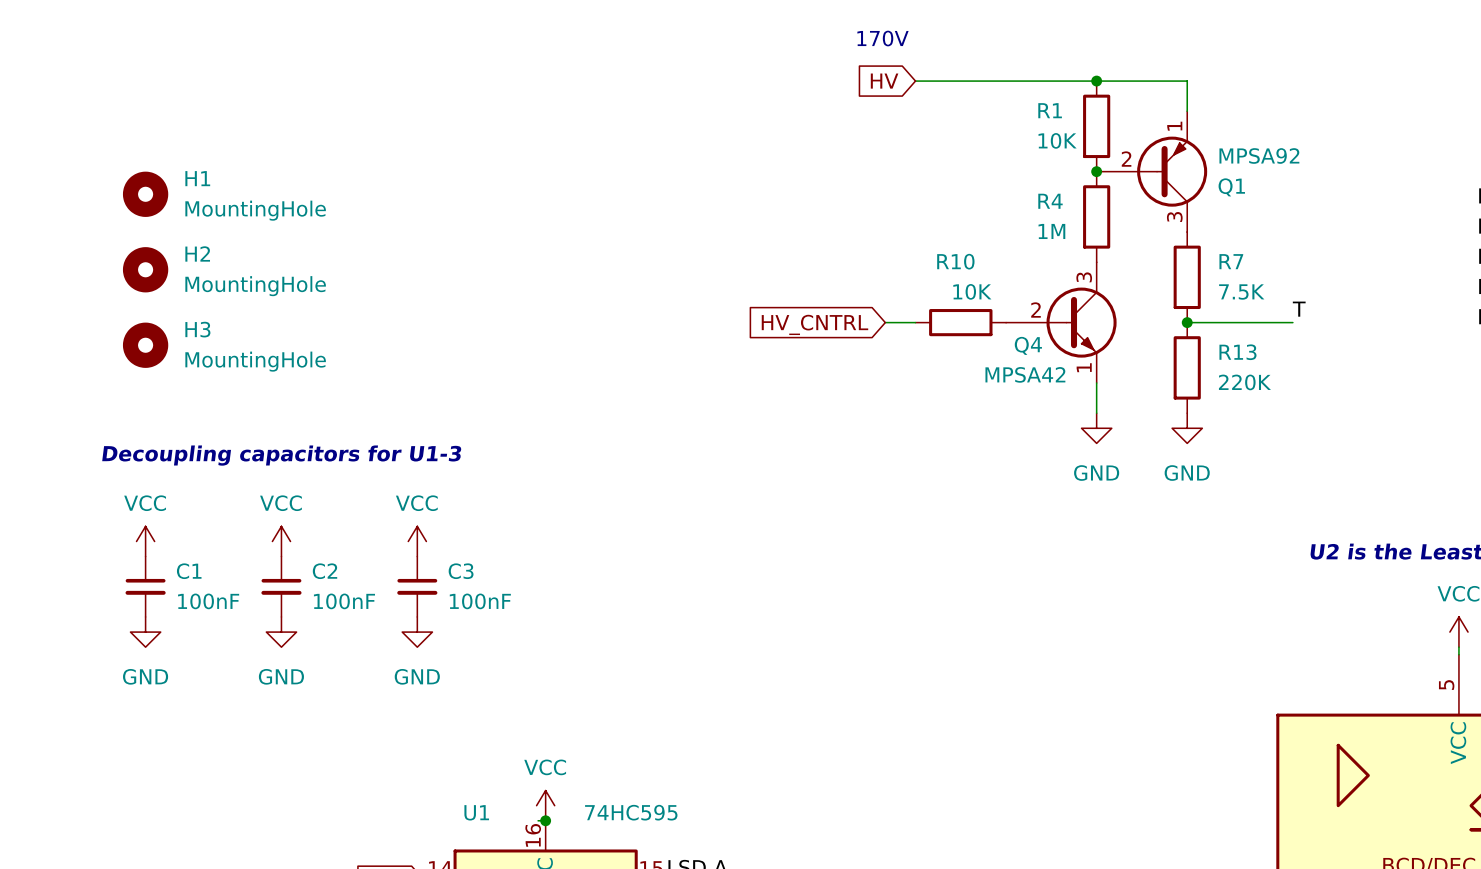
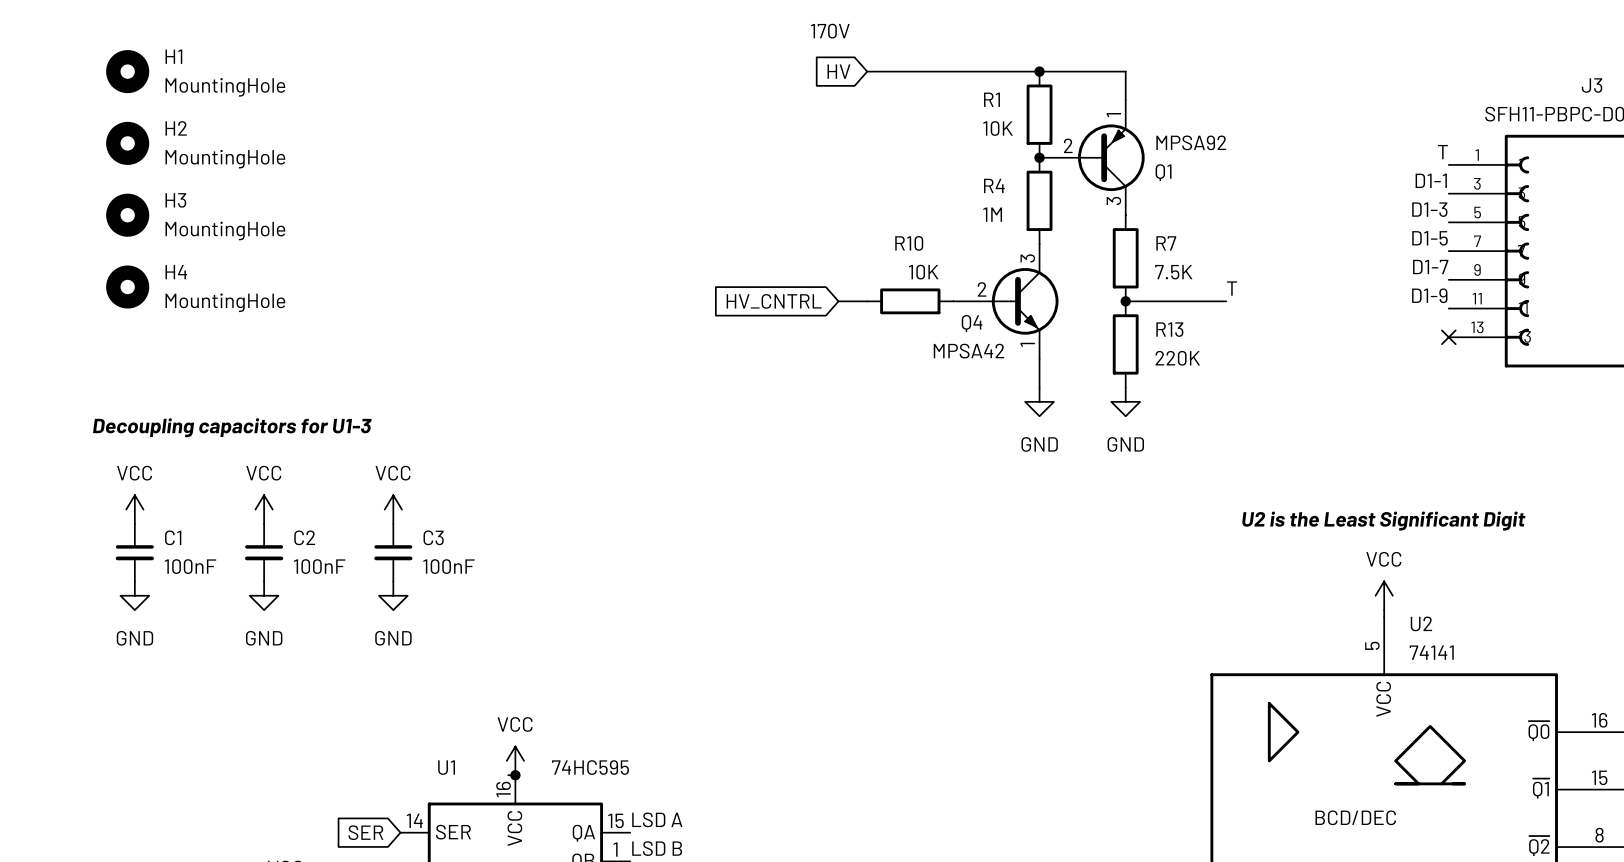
H1 position: (145, 194) -> (127, 71)
H2 position: (145, 269) -> (127, 143)
H4: none -> MountingHole (127, 287)
H3 position: (145, 345) -> (127, 215)

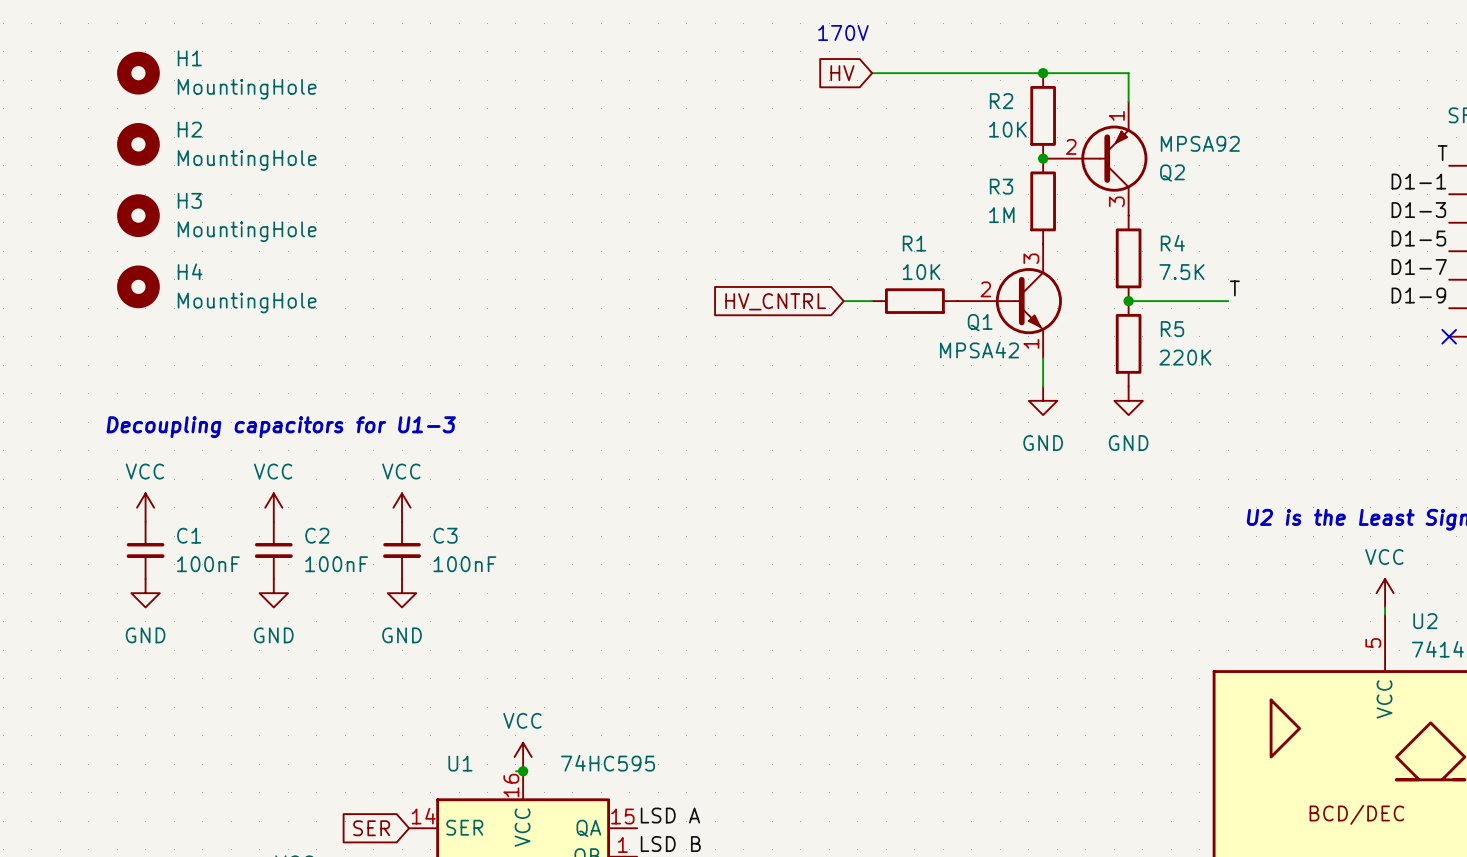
R1 name: R1 (991, 99) -> R2 (1001, 101)
Q1 name: Q1 (1163, 172) -> Q2 (1172, 173)
R4 name: R4 (994, 185) -> R3 (1001, 186)
R10 name: R10 (909, 243) -> R1 (914, 243)
R7 name: R7 (1166, 243) -> R4 (1172, 243)
Q4 name: Q4 (972, 323) -> Q1 (980, 322)
R13 name: R13 (1169, 329) -> R5 (1172, 329)

